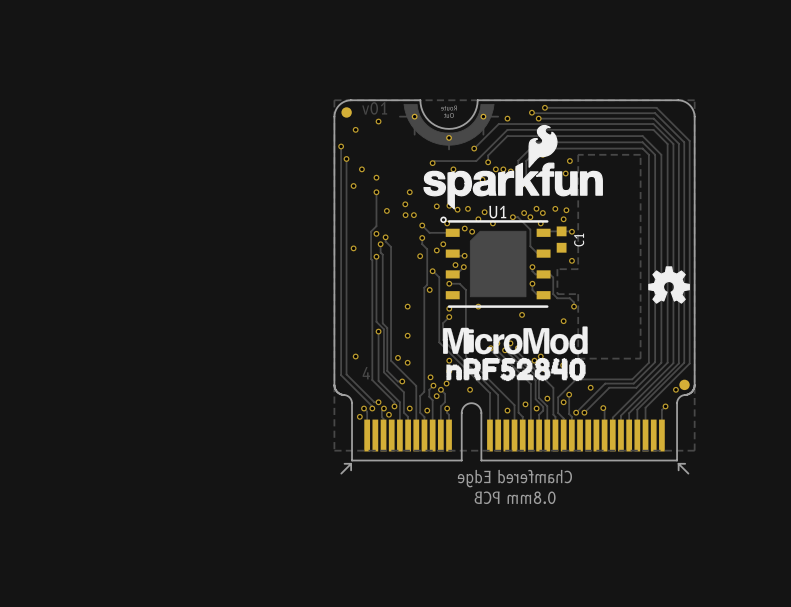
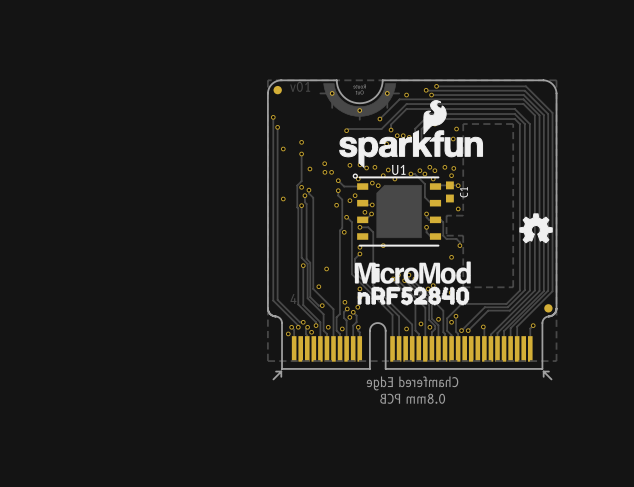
via: (378, 121) -> none
via: (355, 129) -> none
via: (361, 169) -> none
via: (453, 169) -> none
via: (409, 192) -> none
via: (407, 306) -> none
via: (522, 314) -> none
via: (355, 356) -> none
via: (407, 362) -> none
via: (590, 387) -> none
via: (470, 389) -> none
via: (675, 389) -> none

